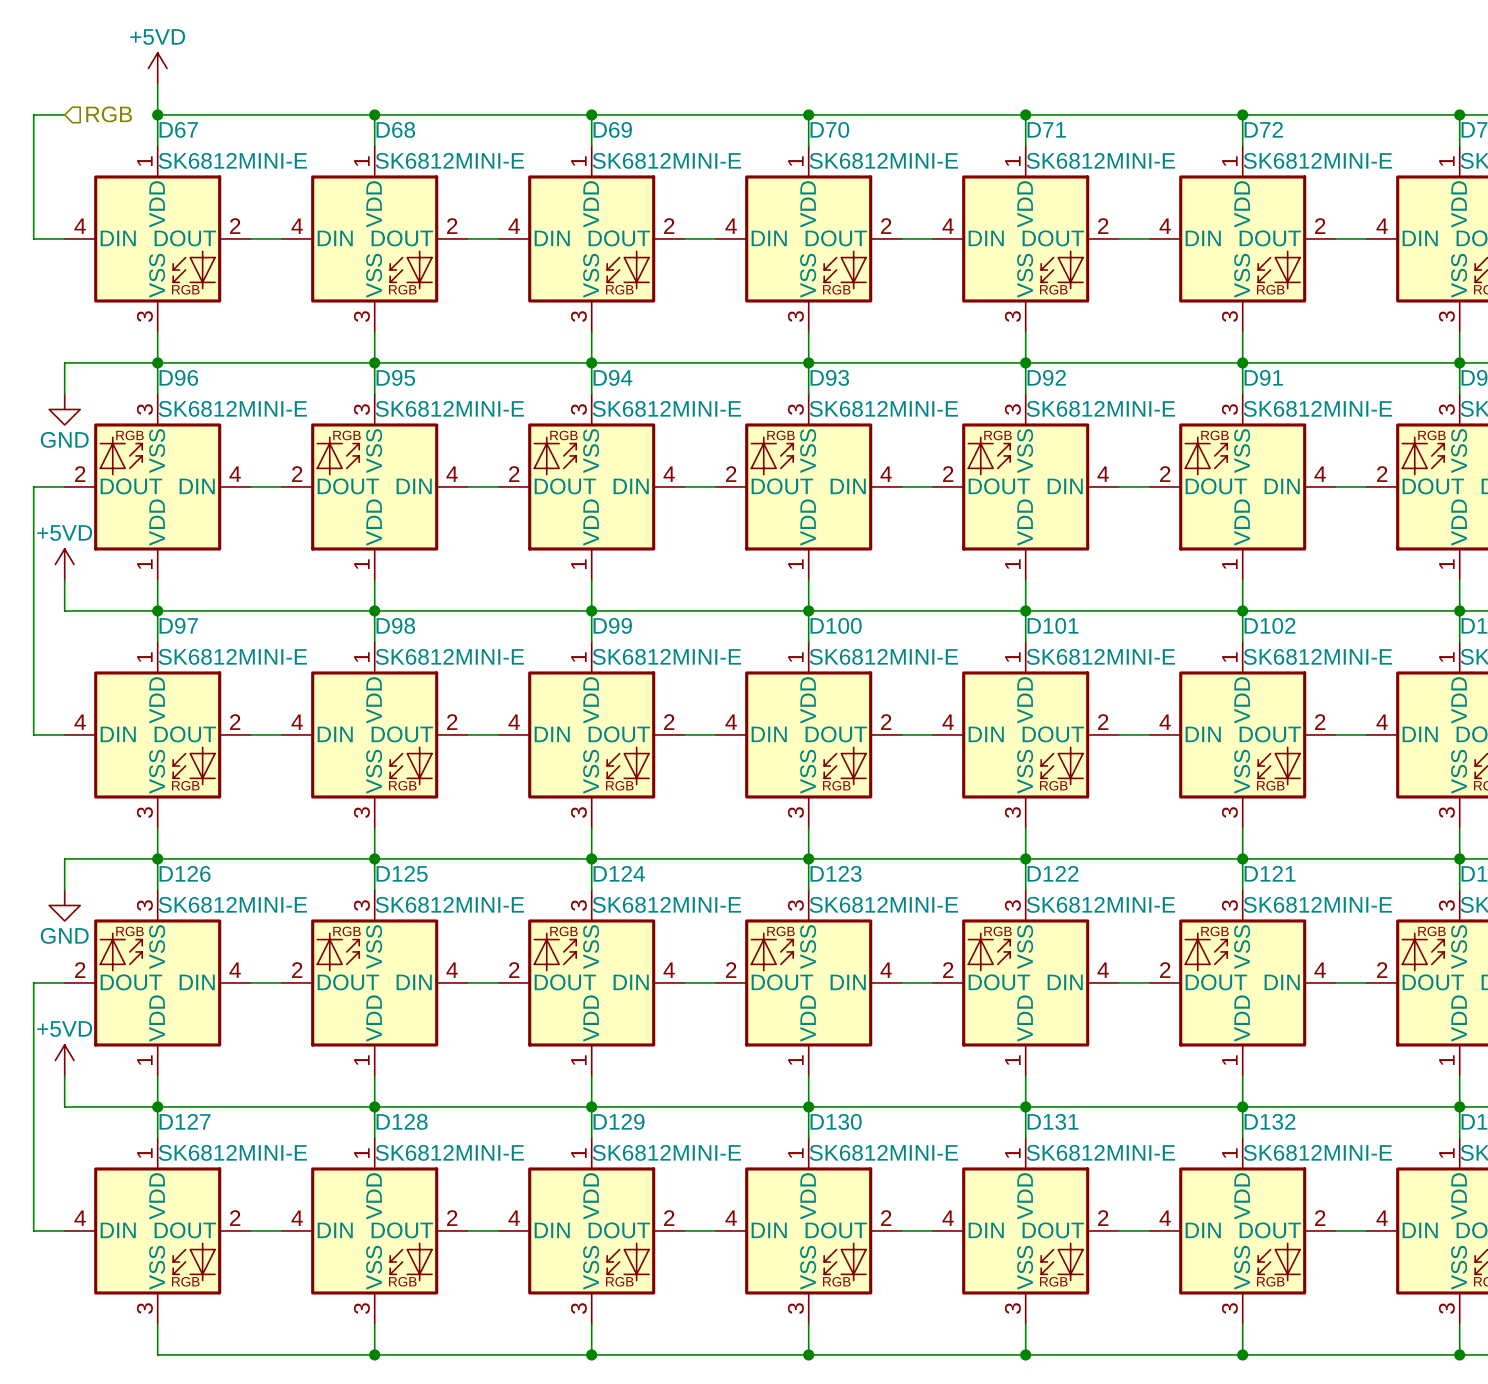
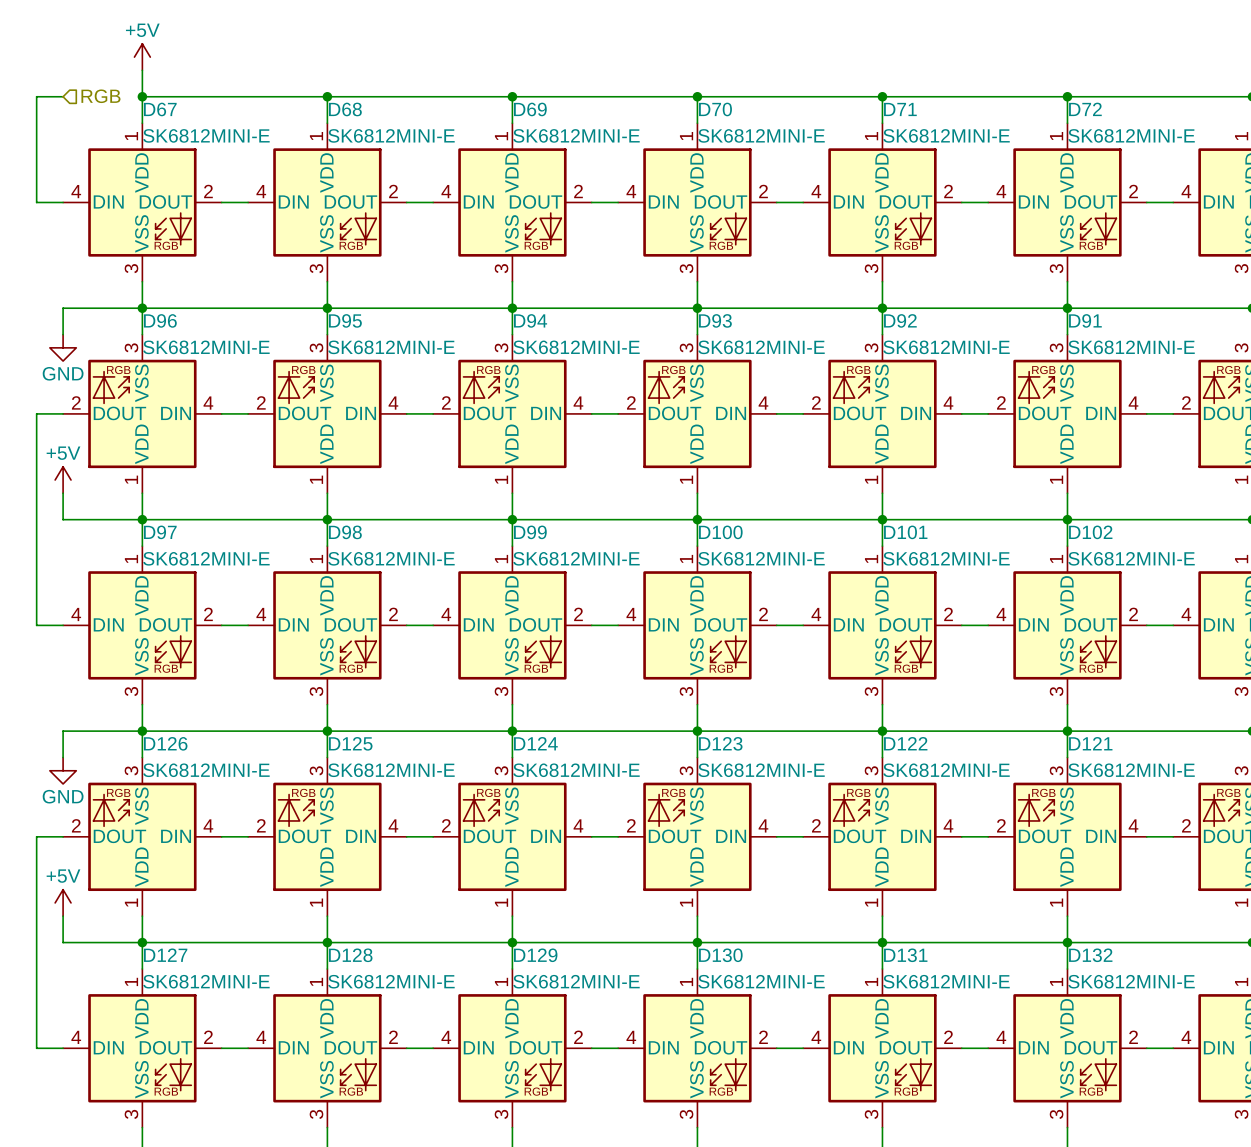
power symbol: +5VD (157, 68) -> +5V (142, 57)
power symbol: +5VD (64, 564) -> +5V (63, 480)
power symbol: +5VD (64, 1060) -> +5V (63, 902)

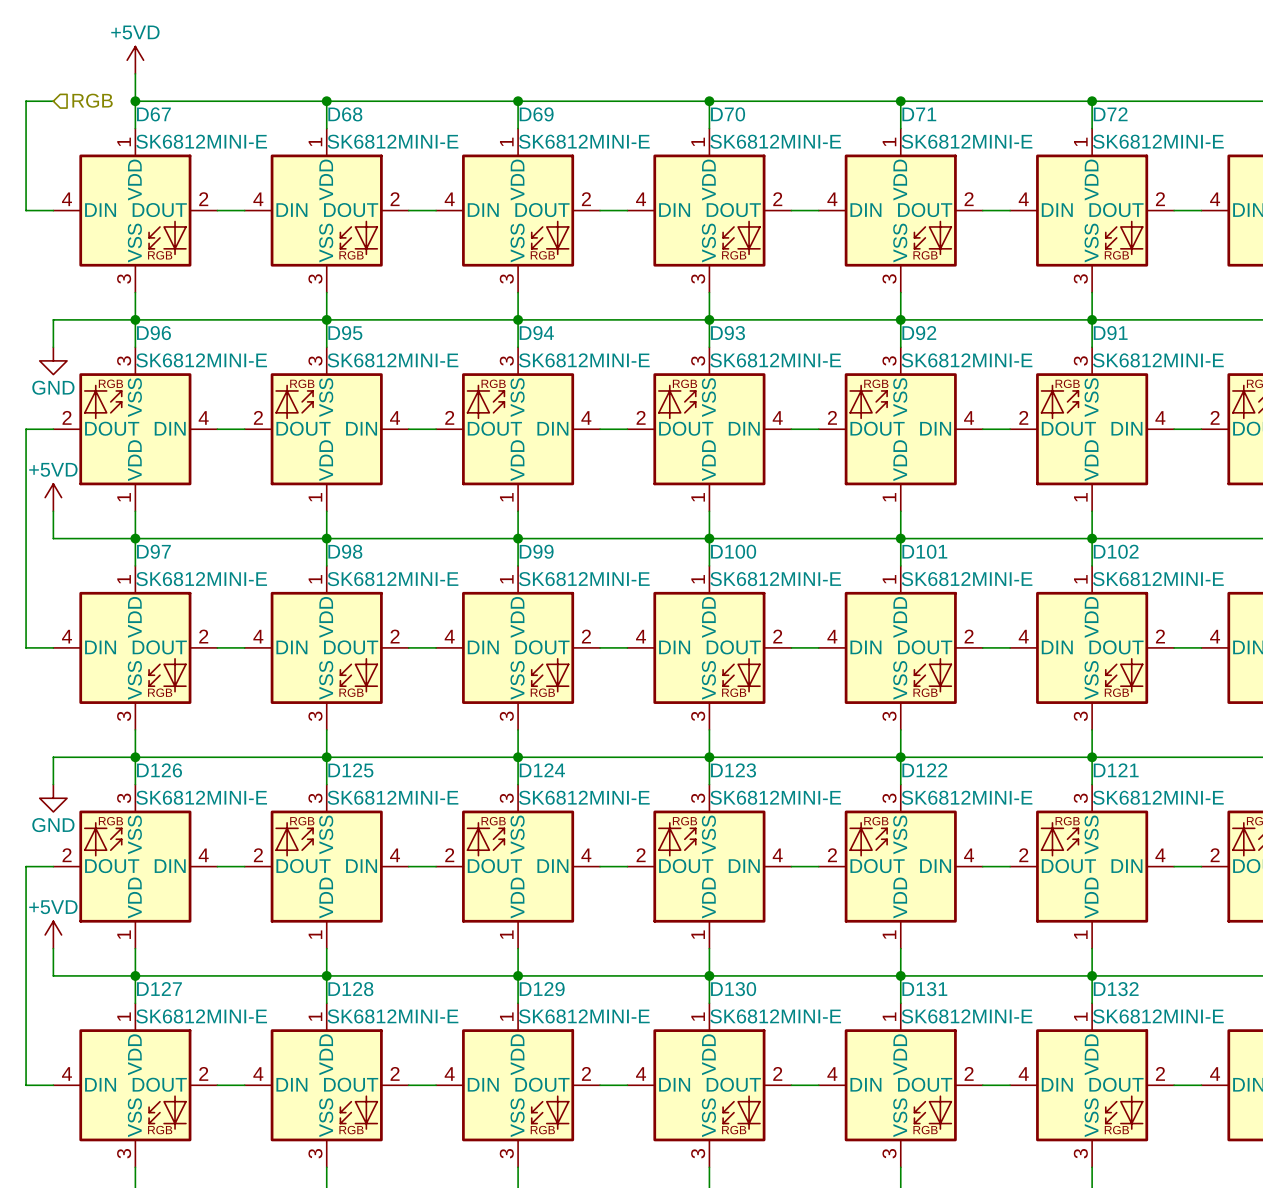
power symbol: +5V (142, 57) -> +5VD (135, 60)
power symbol: +5V (63, 480) -> +5VD (53, 497)
power symbol: +5V (63, 902) -> +5VD (53, 934)

